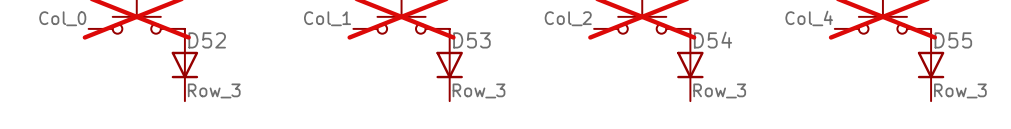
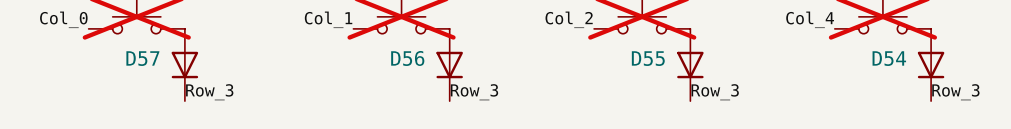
D52 name: D52 (207, 40) -> D57 (142, 58)
D53 name: D53 (471, 40) -> D56 (407, 58)
D54 name: D54 (712, 40) -> D55 (648, 58)
D55 name: D55 (953, 40) -> D54 (889, 58)

